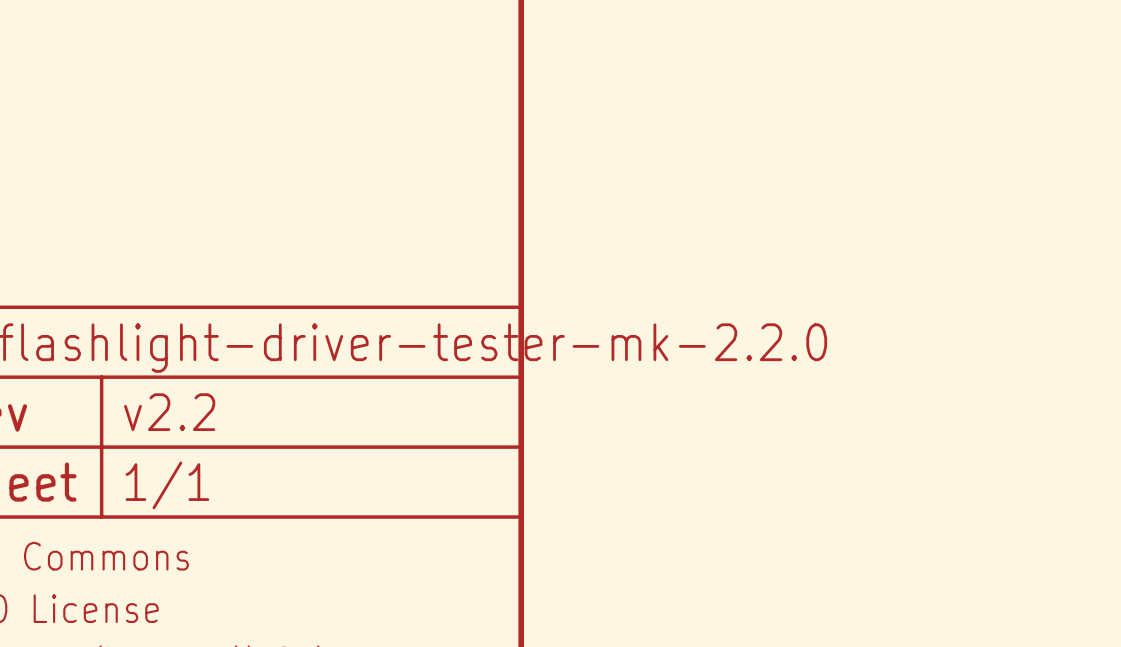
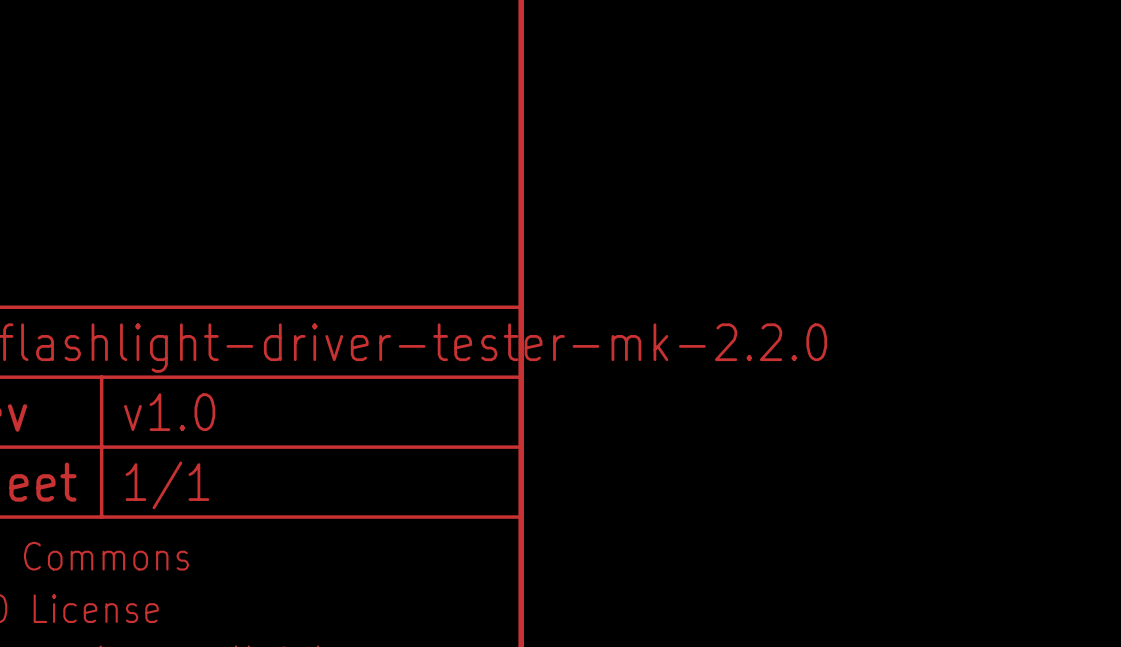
part text: v2.2 (169, 412) -> v1.0 (169, 412)

